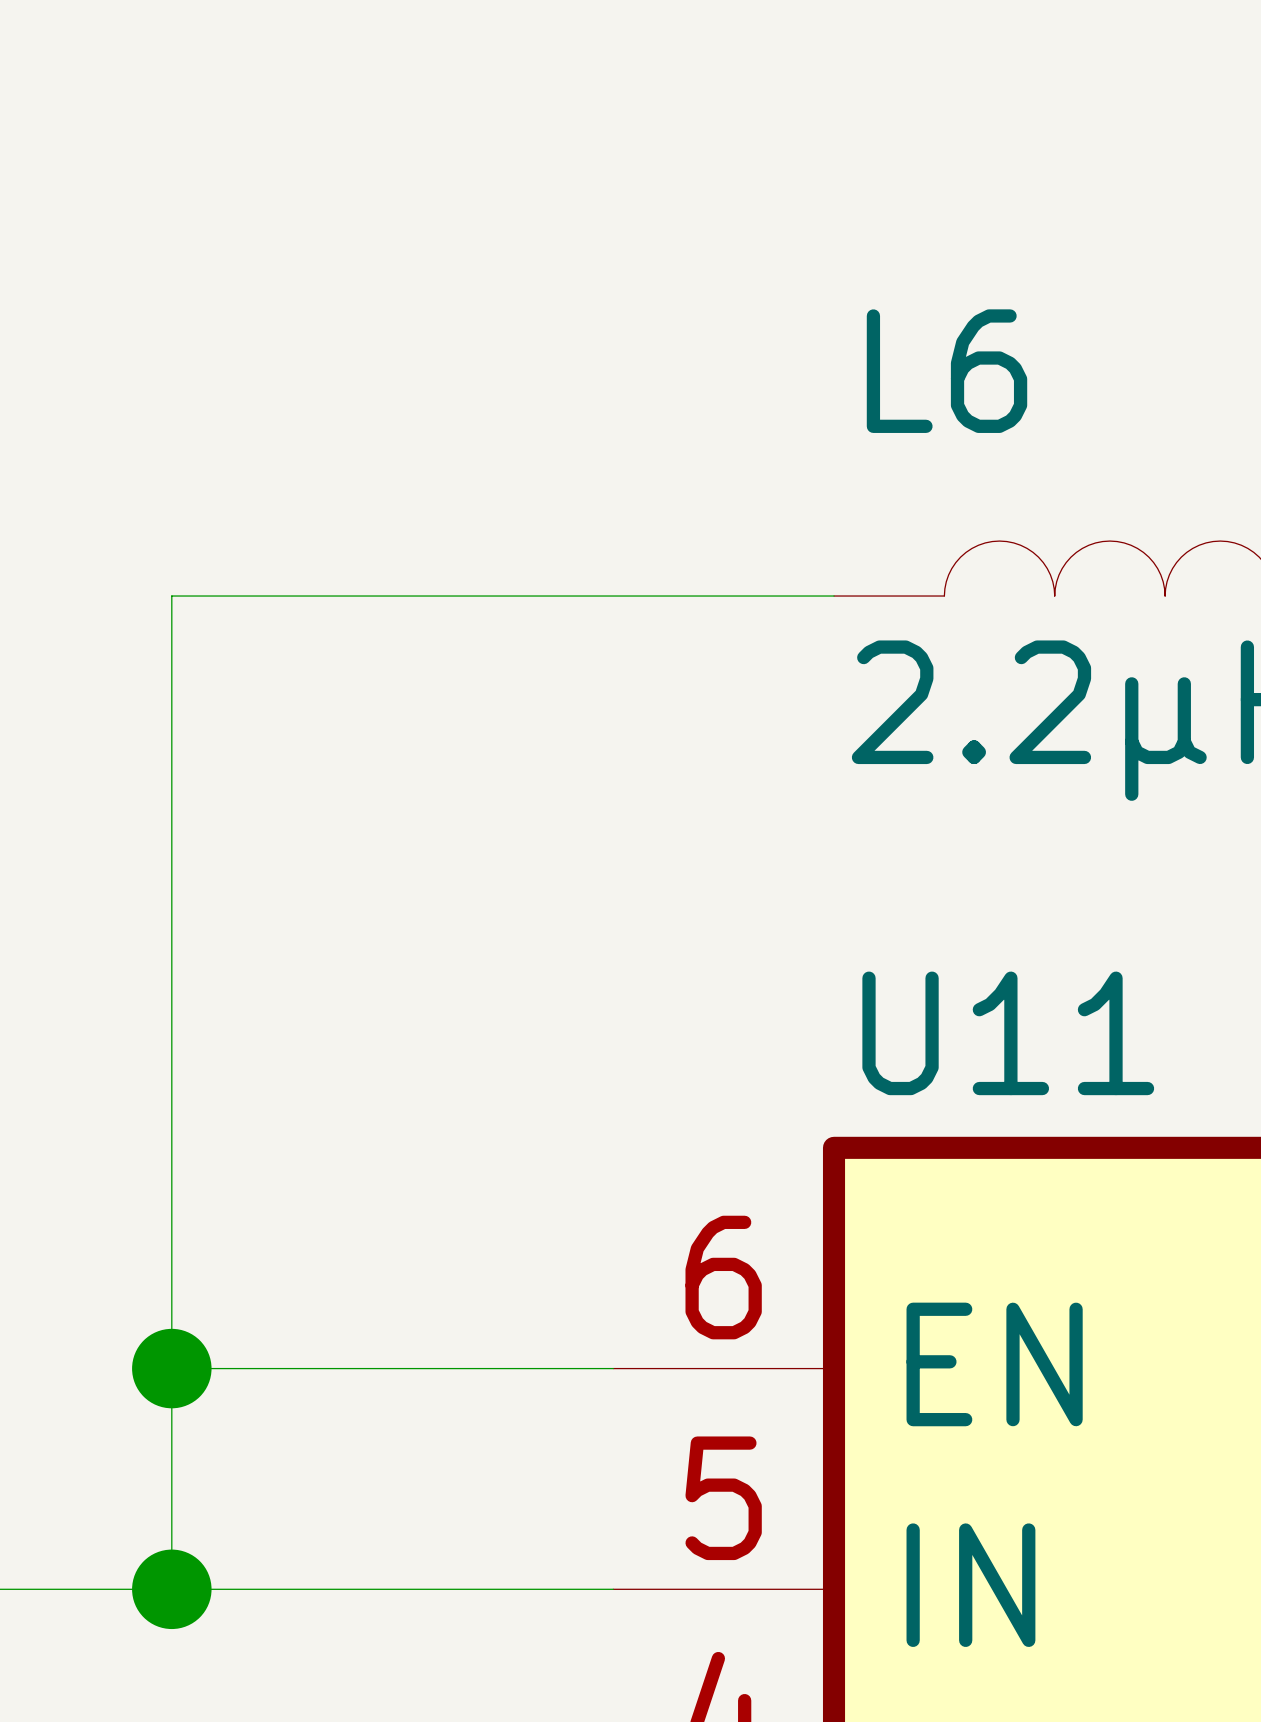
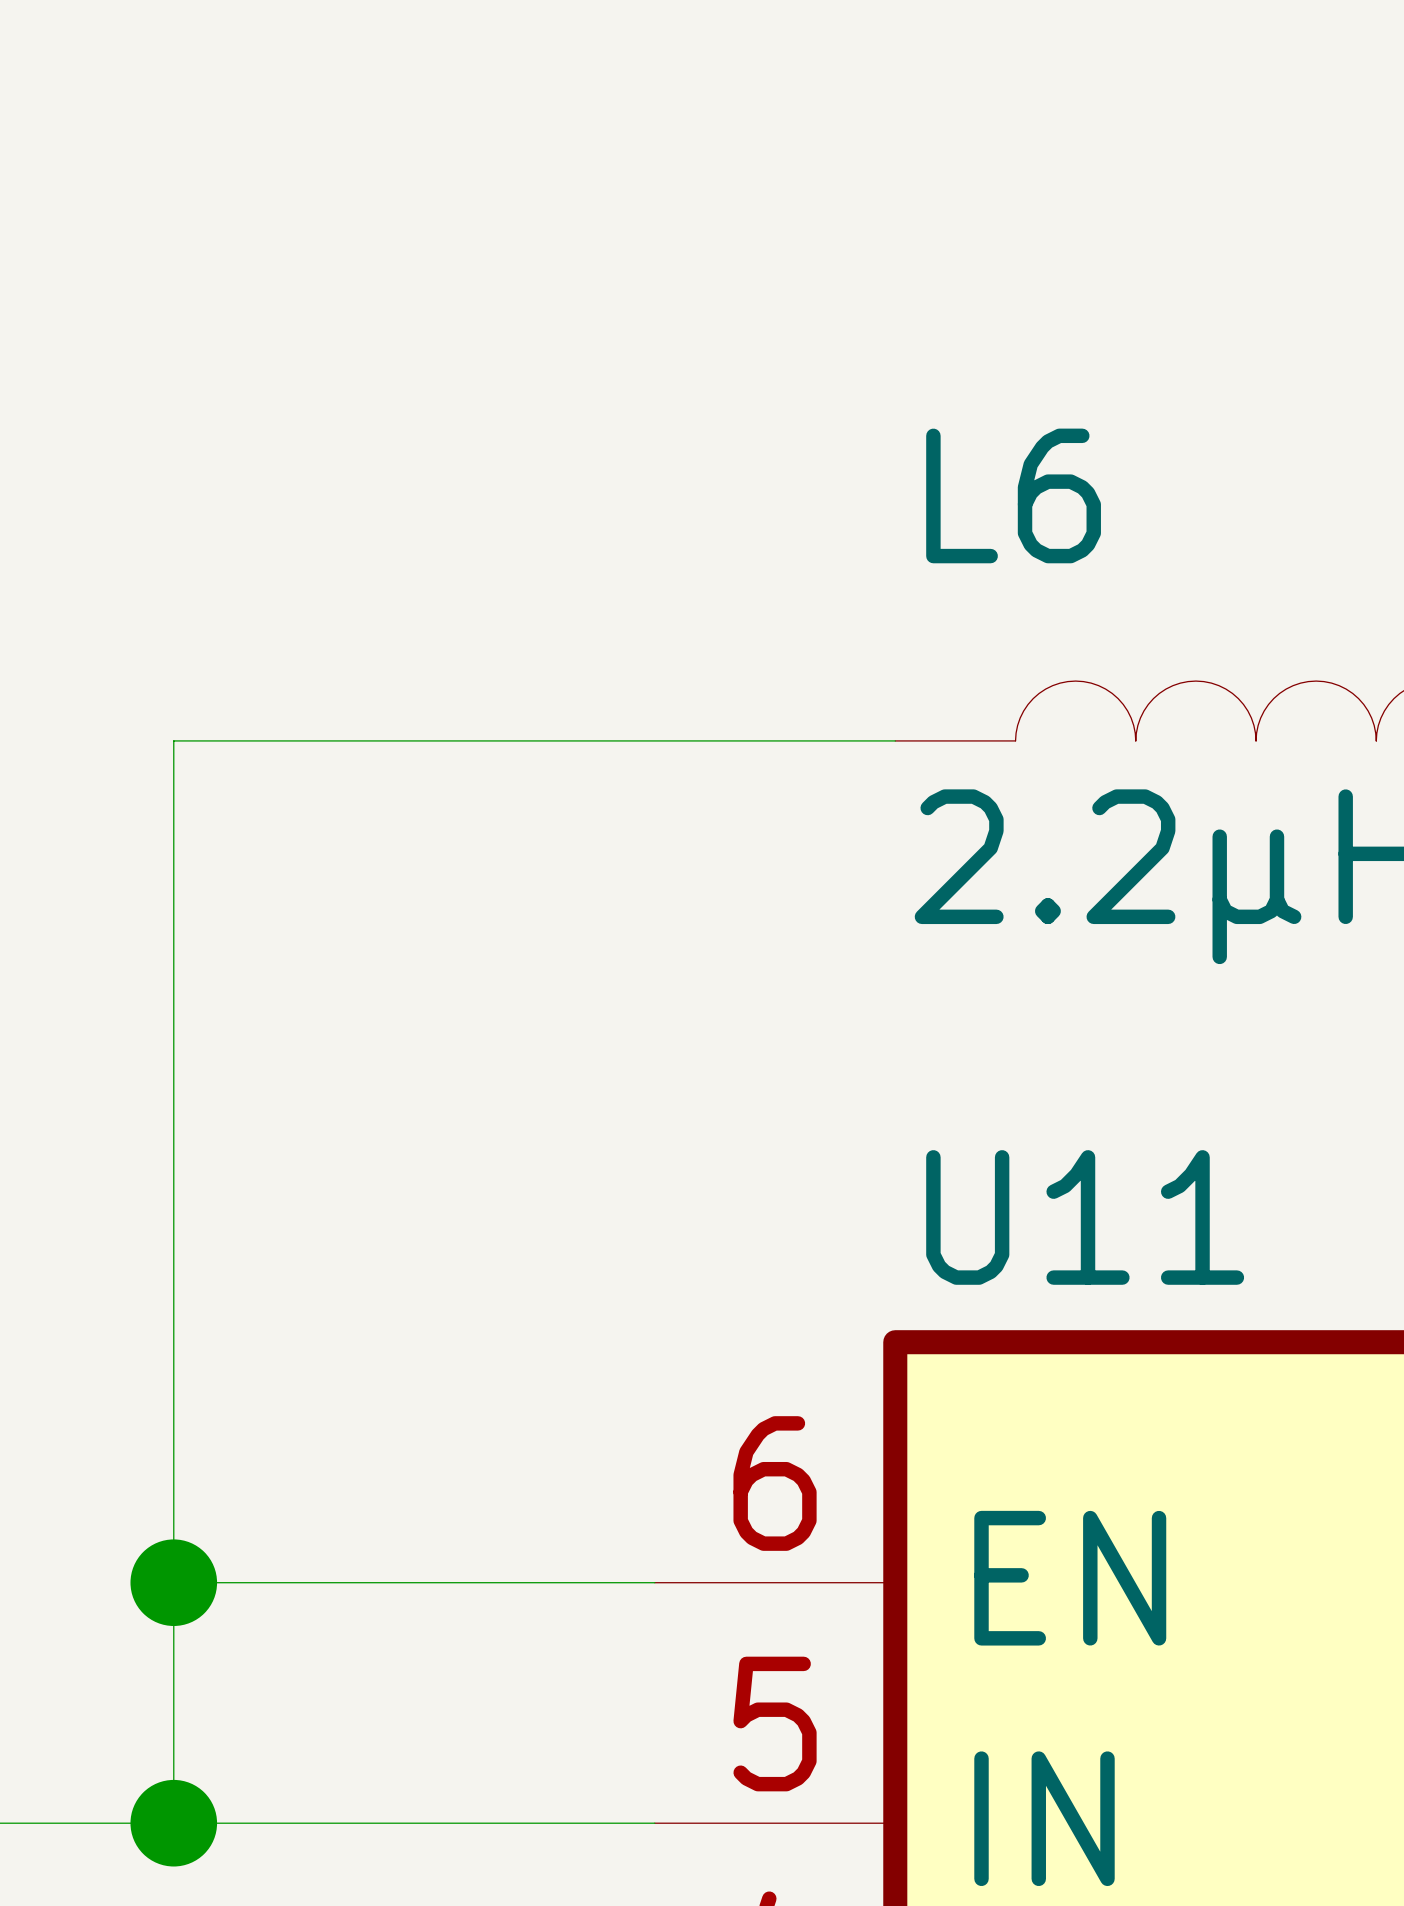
L6 name position: L6 (947, 371) -> L6 (1013, 495)

